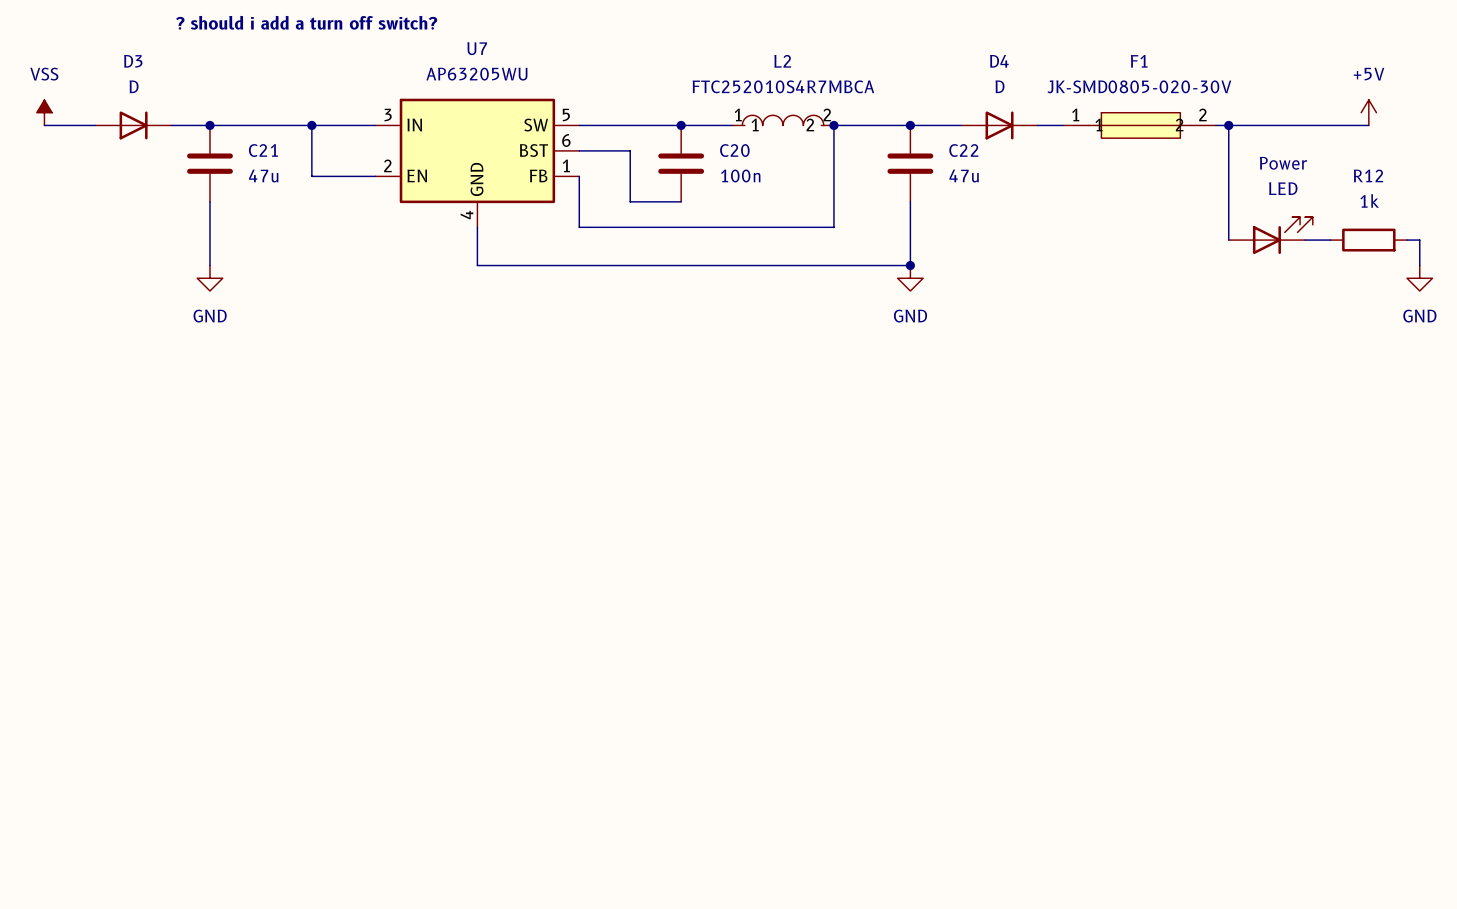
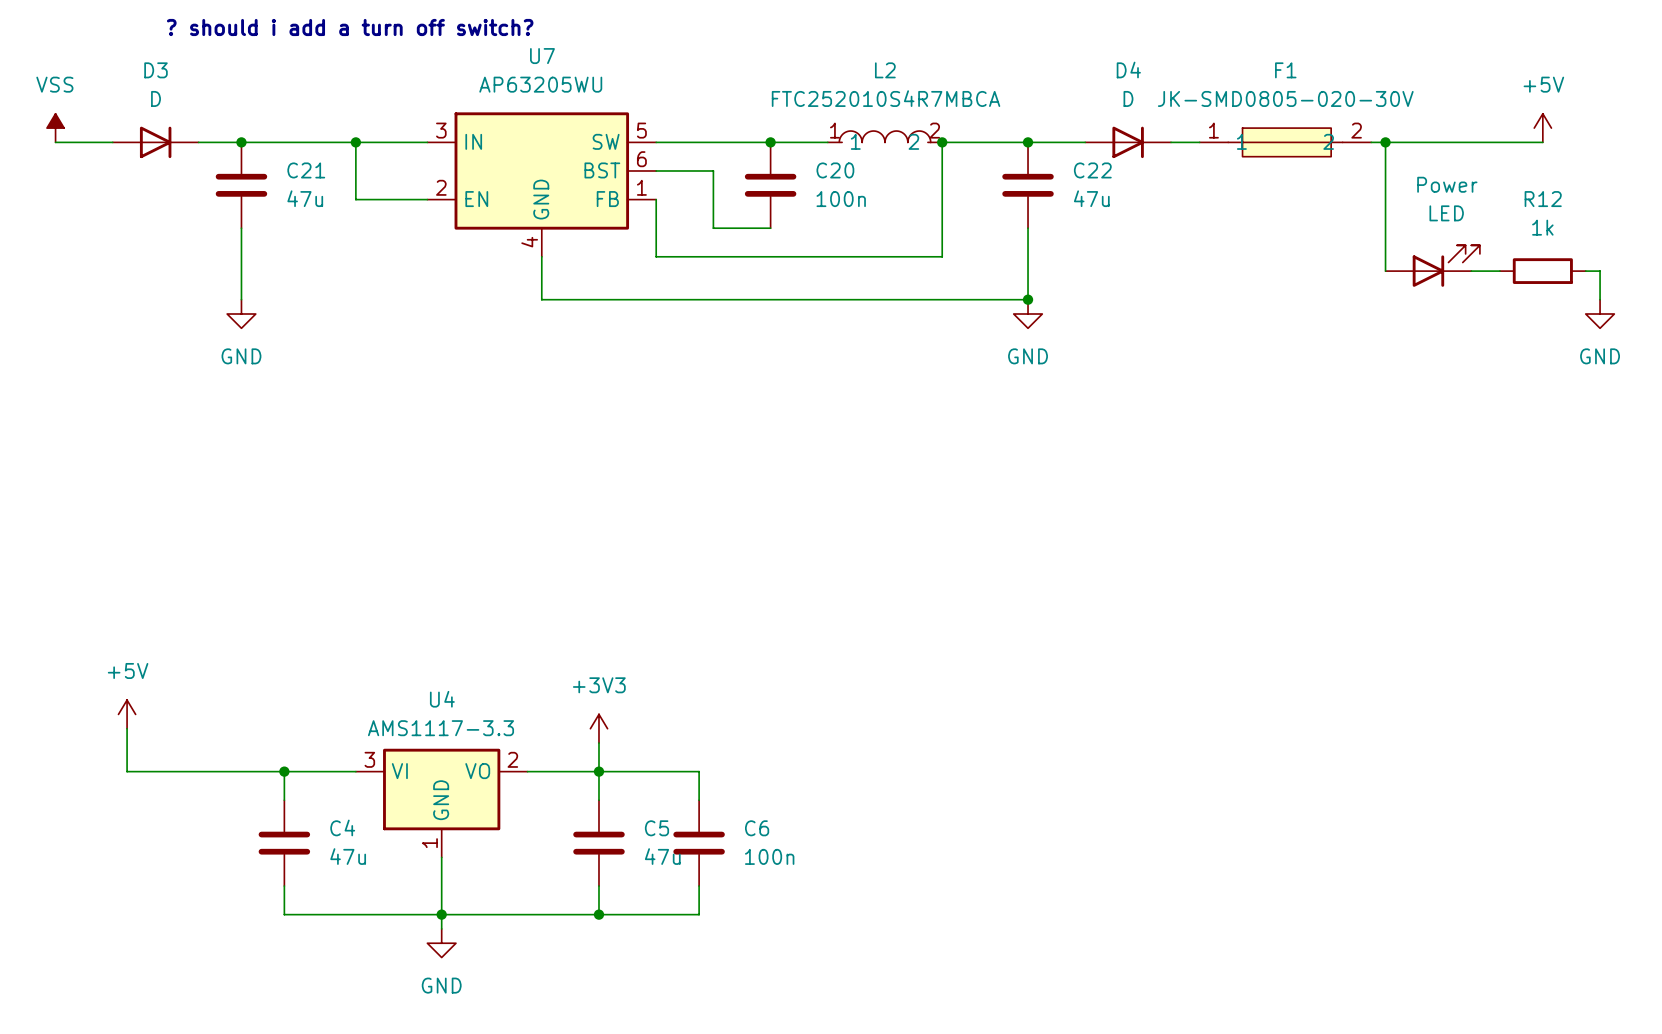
power symbol: none -> +5V (127, 714)
wire: none -> (127, 728) (127, 771) (355, 771)
power symbol: none -> +3V3 (598, 728)
wire: none -> (598, 743) (598, 800)
wire: none -> (284, 771) (284, 800)
junction: none -> (284, 771)
wire: none -> (527, 771) (699, 771) (699, 800)
junction: none -> (598, 771)
U4: none -> AMS1117-3.3 (441, 803)
C4: none -> 47u (284, 843)
C5: none -> 47u (598, 843)
C6: none -> 100n (699, 843)
wire: none -> (441, 857) (441, 928)
wire: none -> (284, 886) (284, 914) (699, 914) (699, 886)
wire: none -> (598, 886) (598, 914)
junction: none -> (441, 914)
junction: none -> (598, 914)
power symbol: none -> GND (441, 943)

